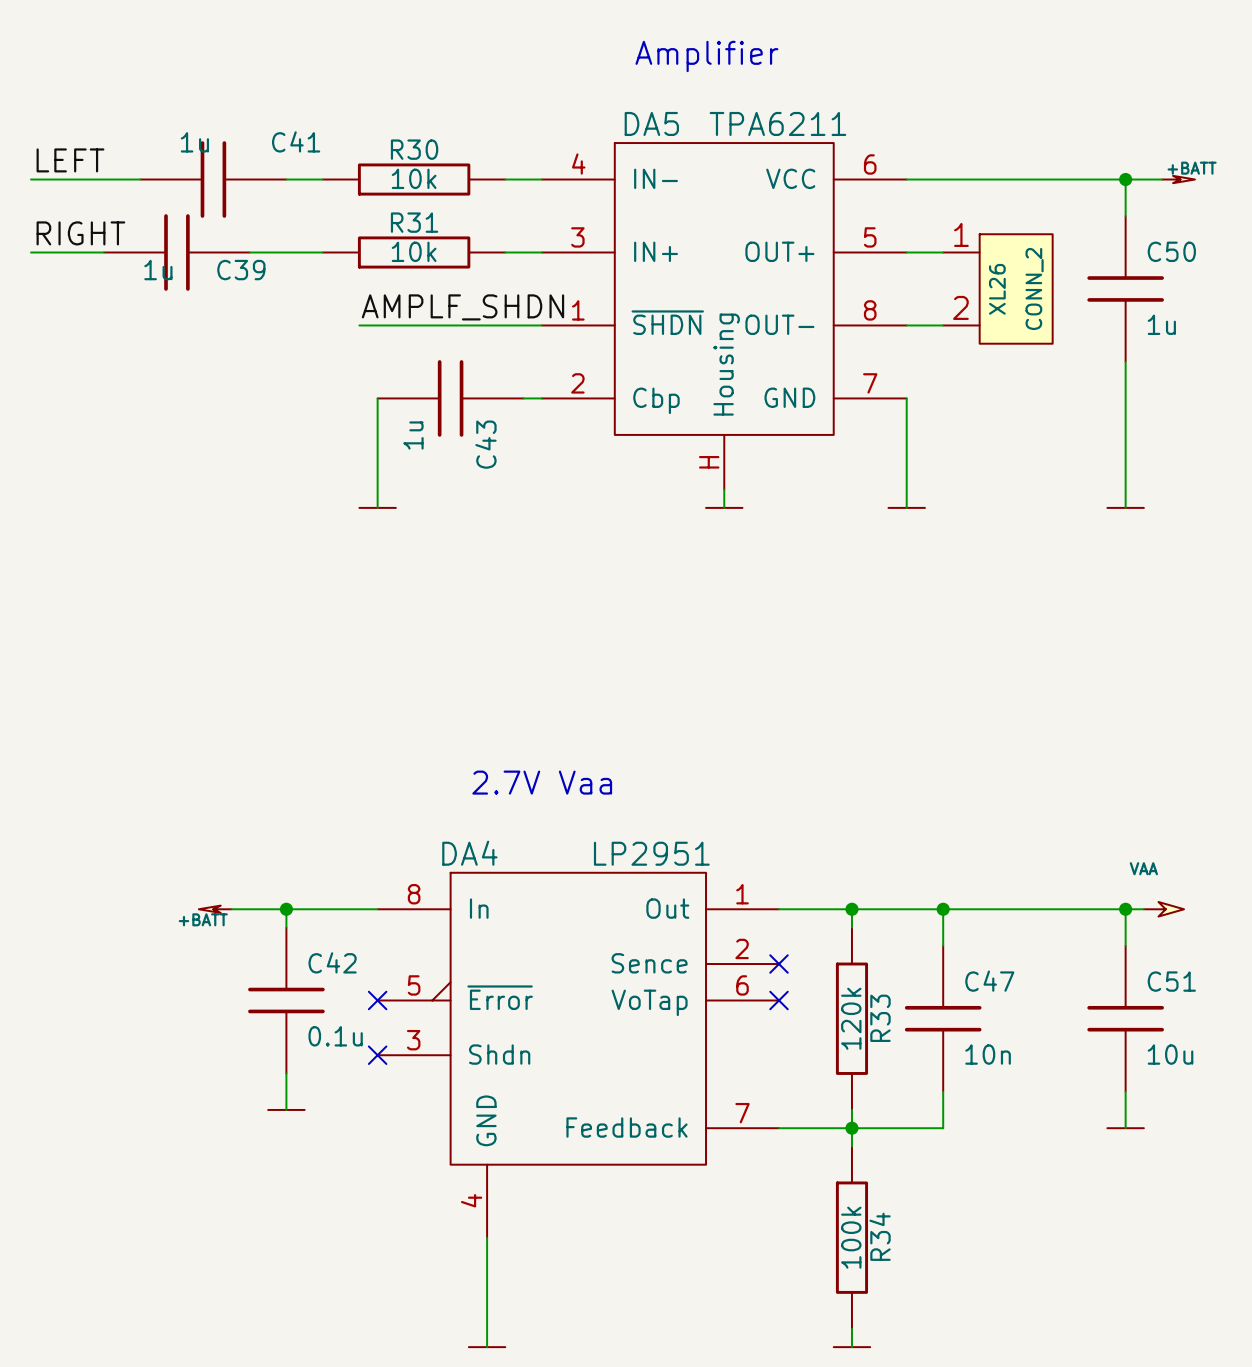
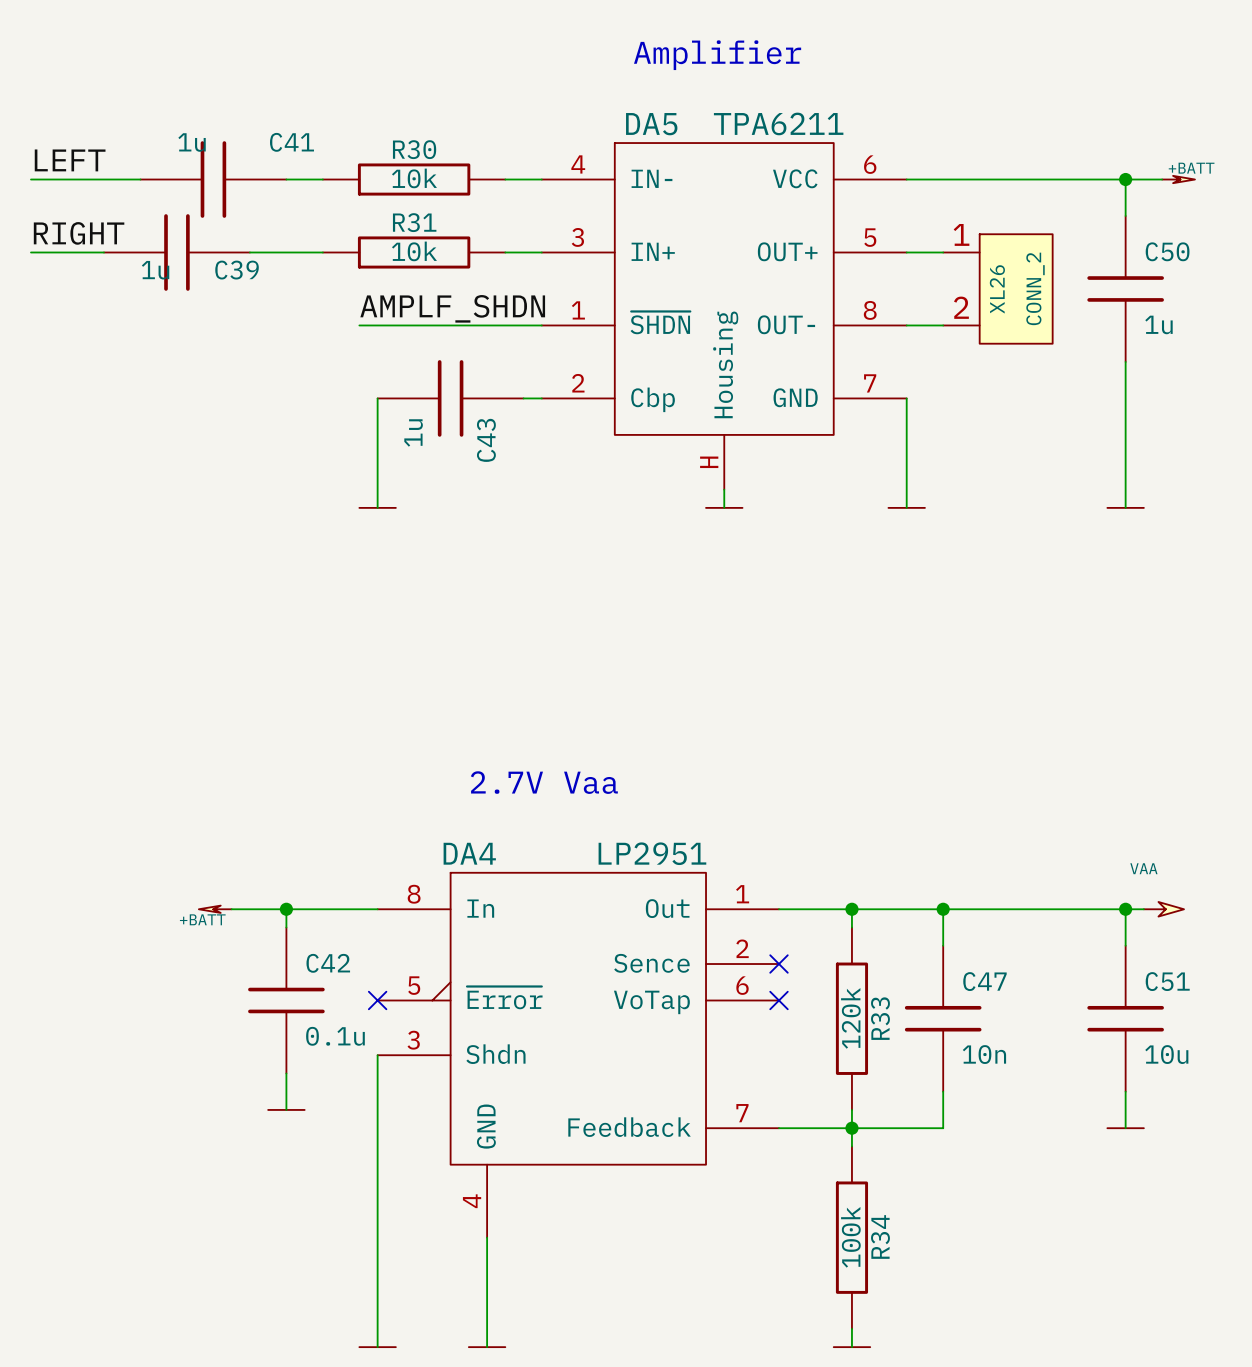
wire: none -> (377, 1055) (377, 1347)
no-connect mark: (377, 1055) -> none
power symbol: none -> (377, 1347)

